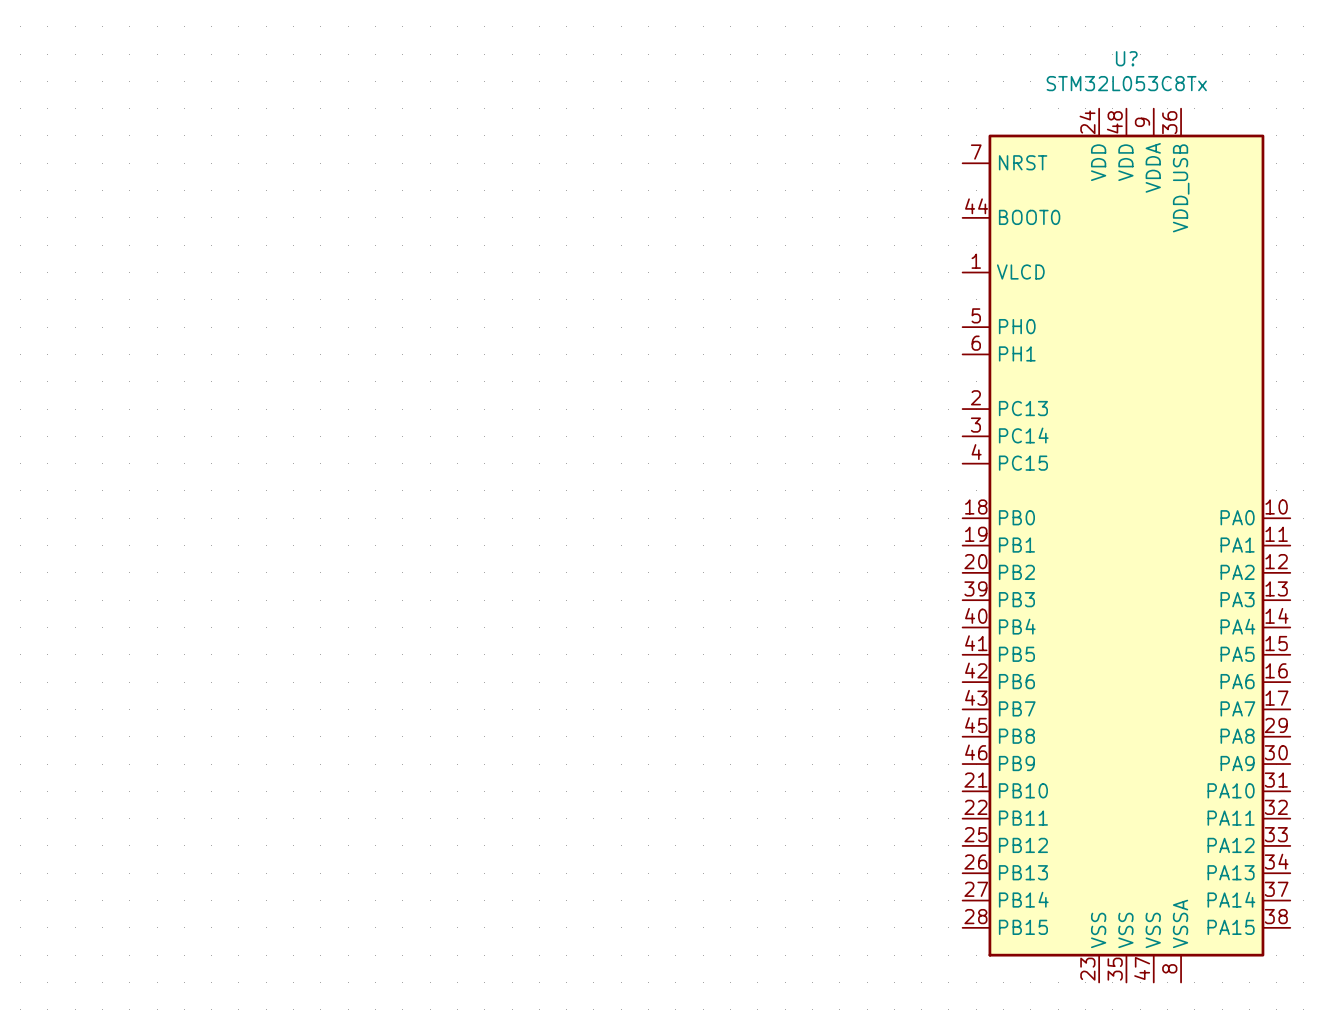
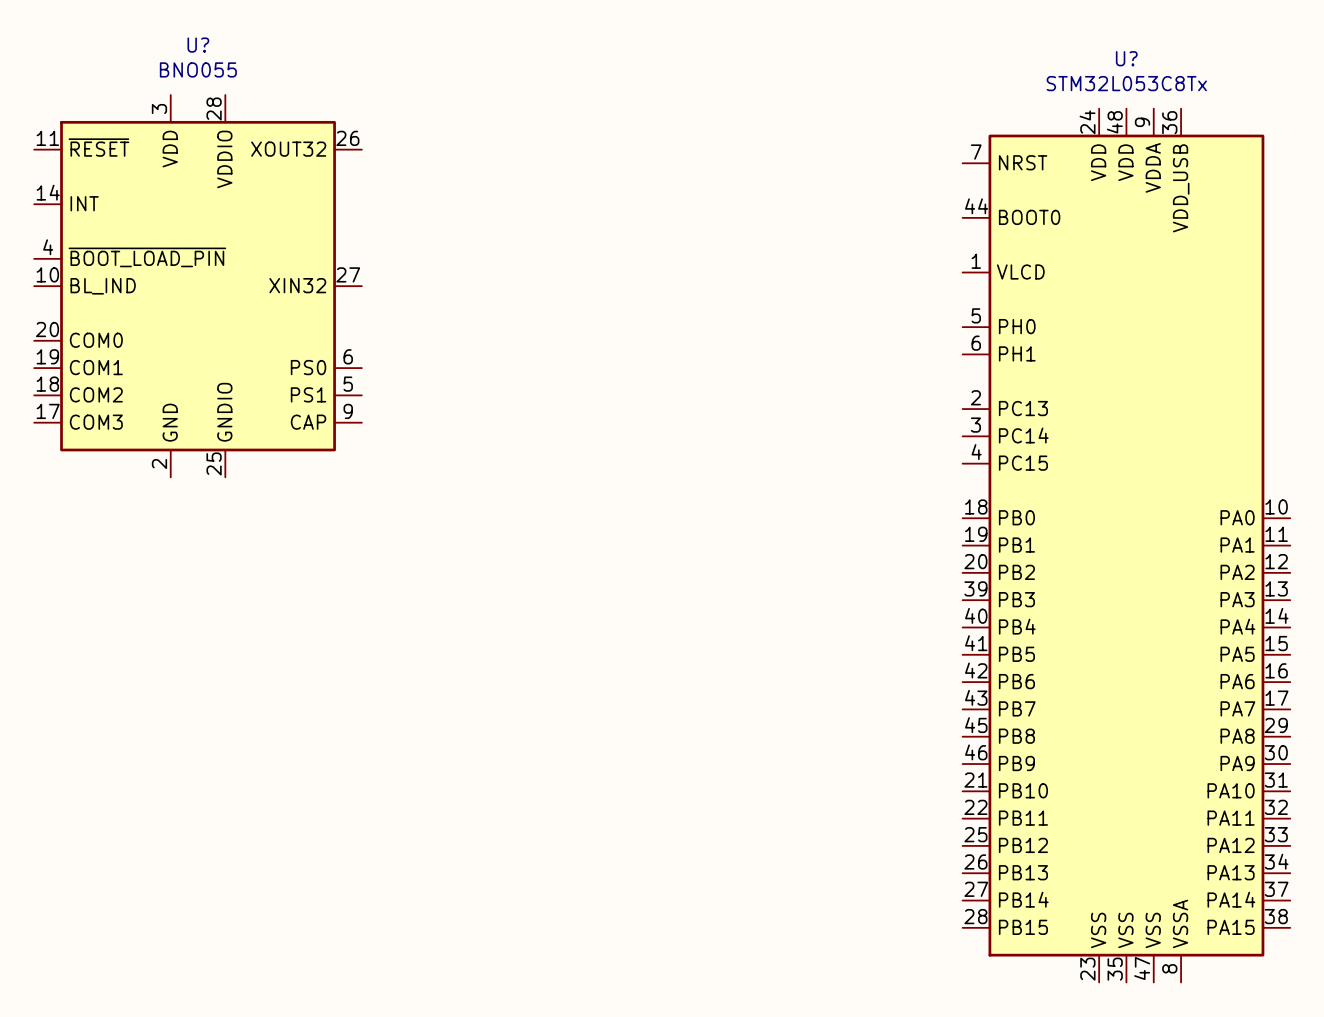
U?: none -> BNO055 (198, 286)

